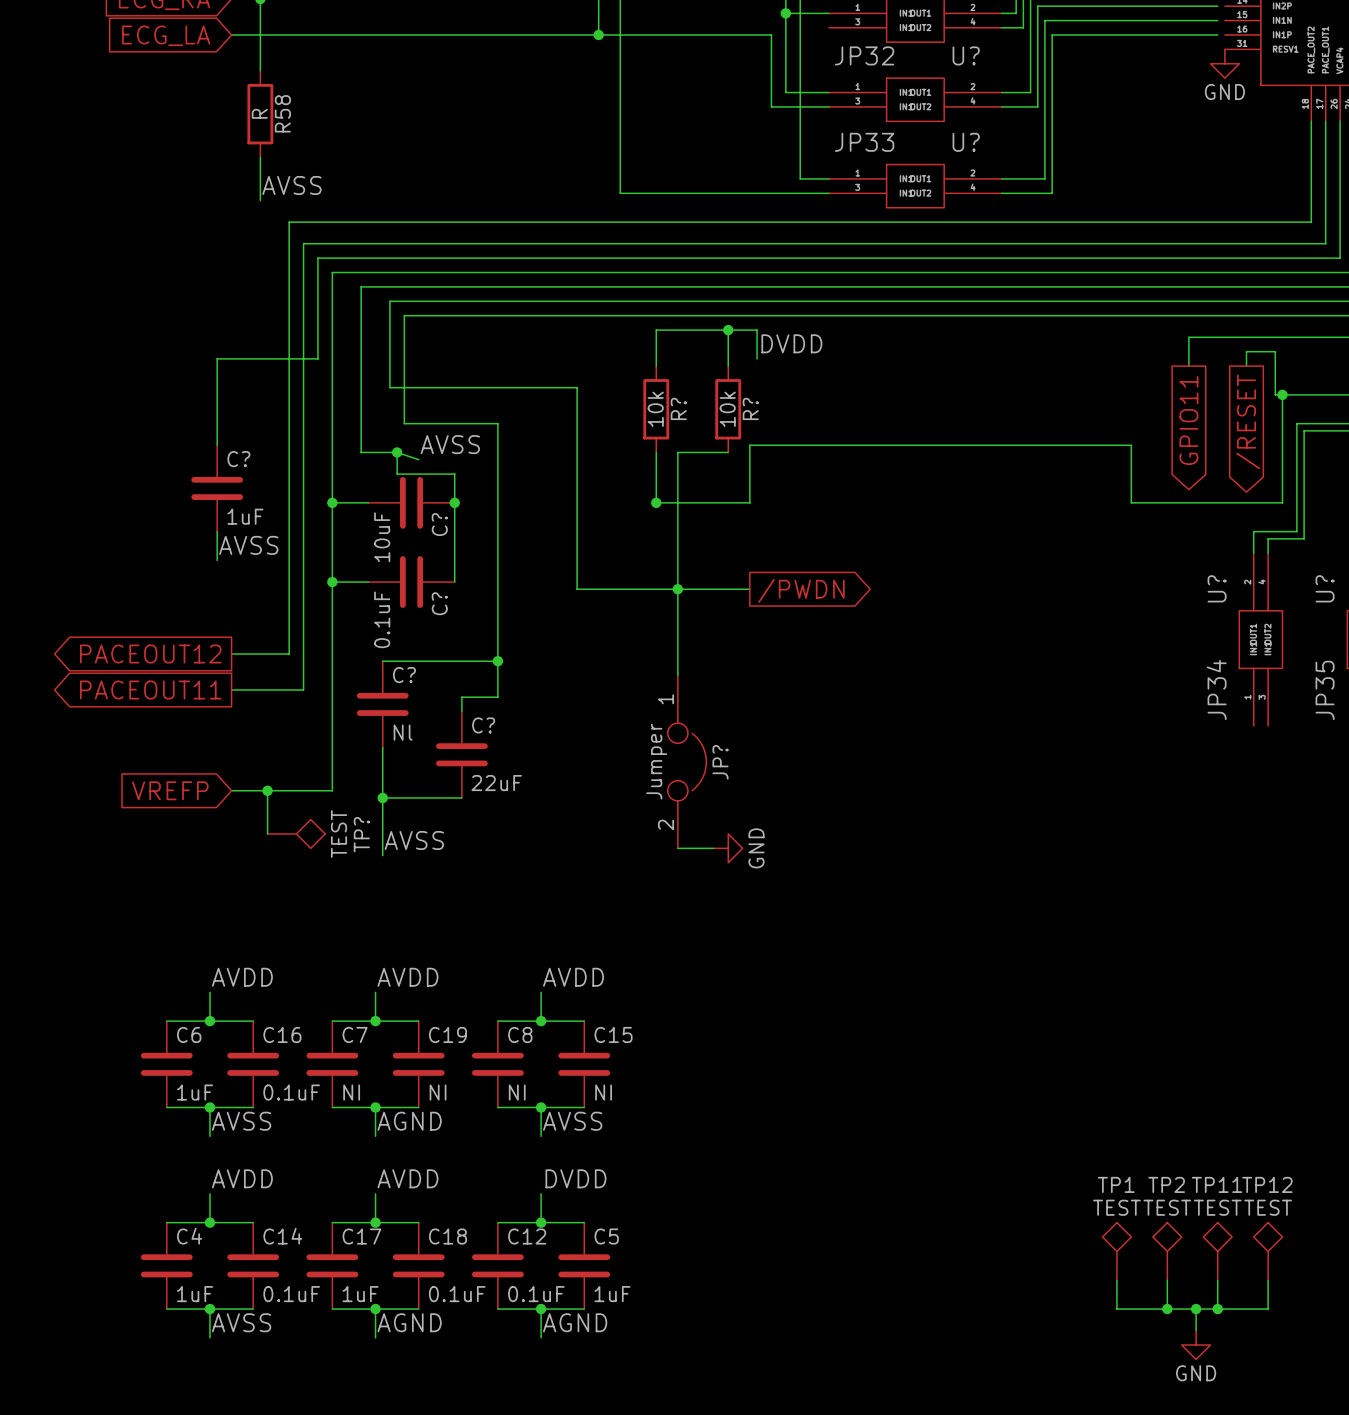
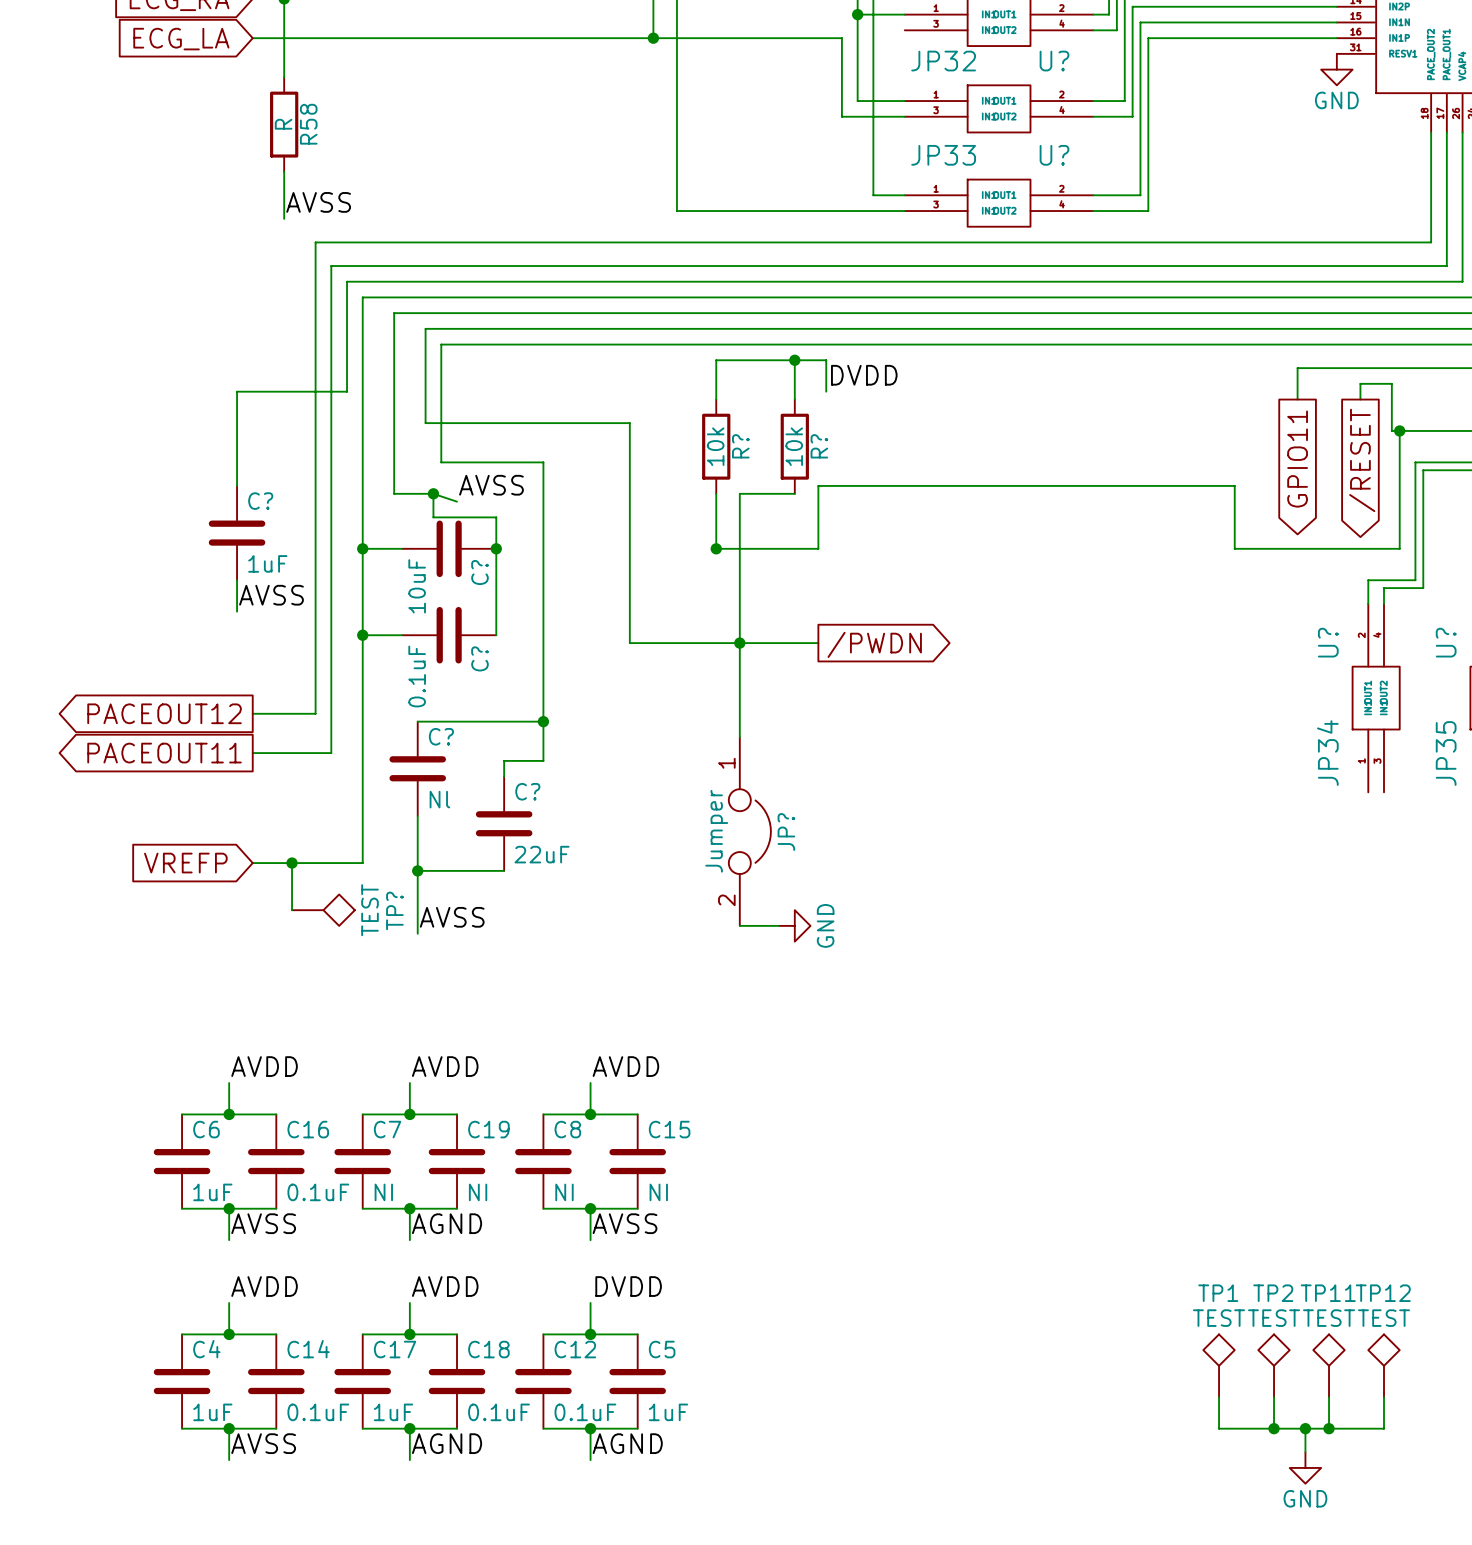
wire: none -> (1329, 6) (1336, 6)
wire: none -> (1329, 22) (1336, 22)
wire: none -> (1329, 38) (1336, 38)

